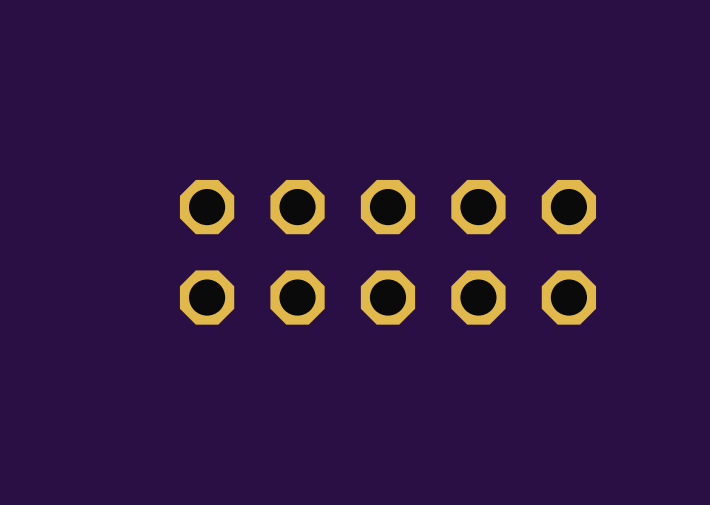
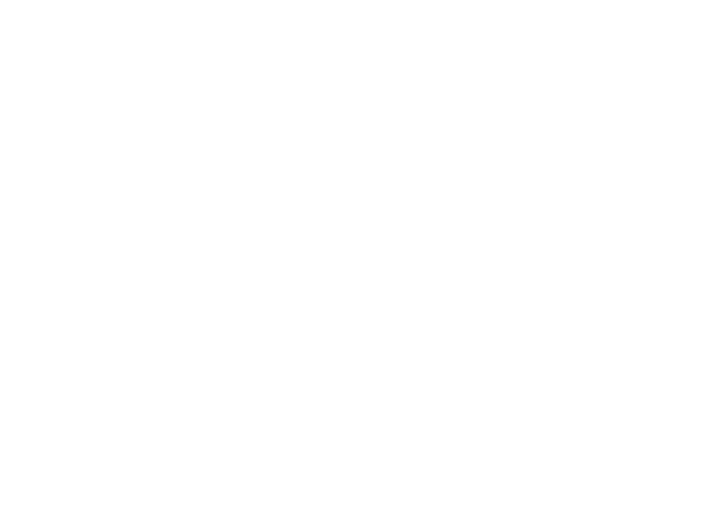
part: (387, 252) -> none

